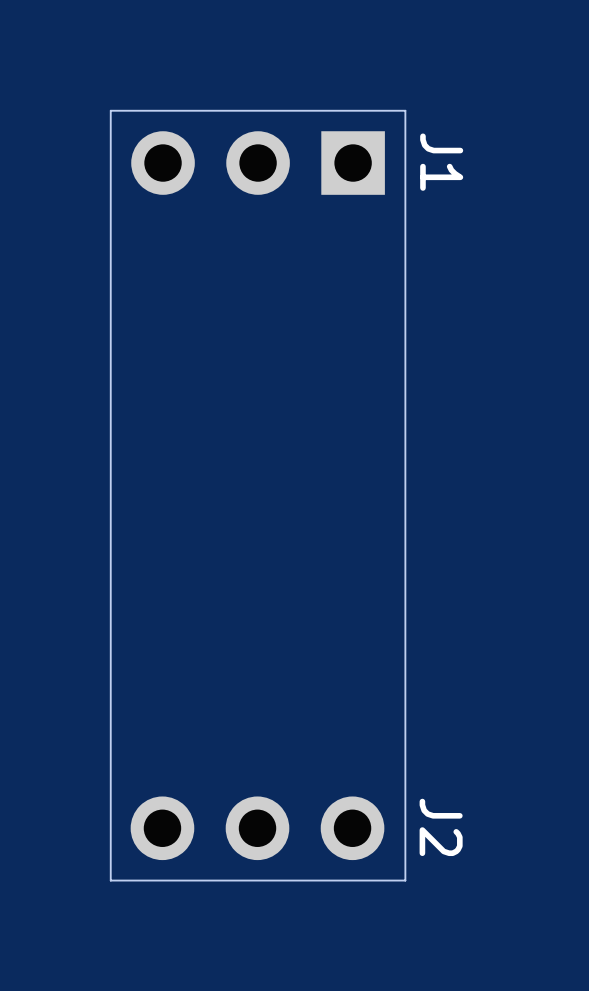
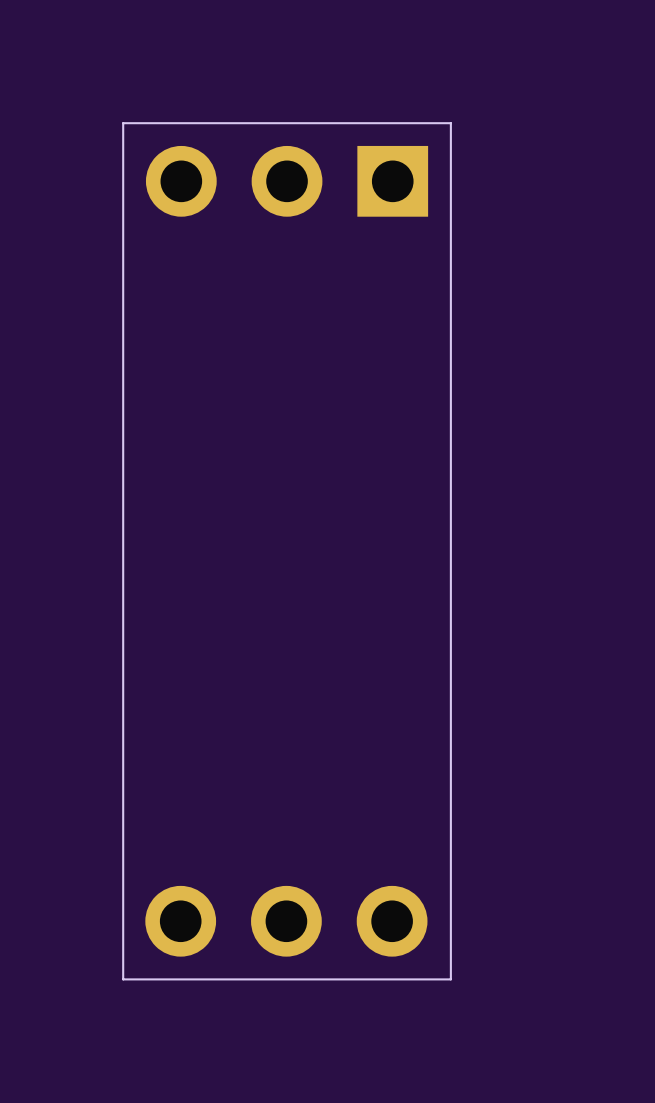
J1 name: J1 (441, 162) -> none
J2 name: J2 (441, 827) -> none

